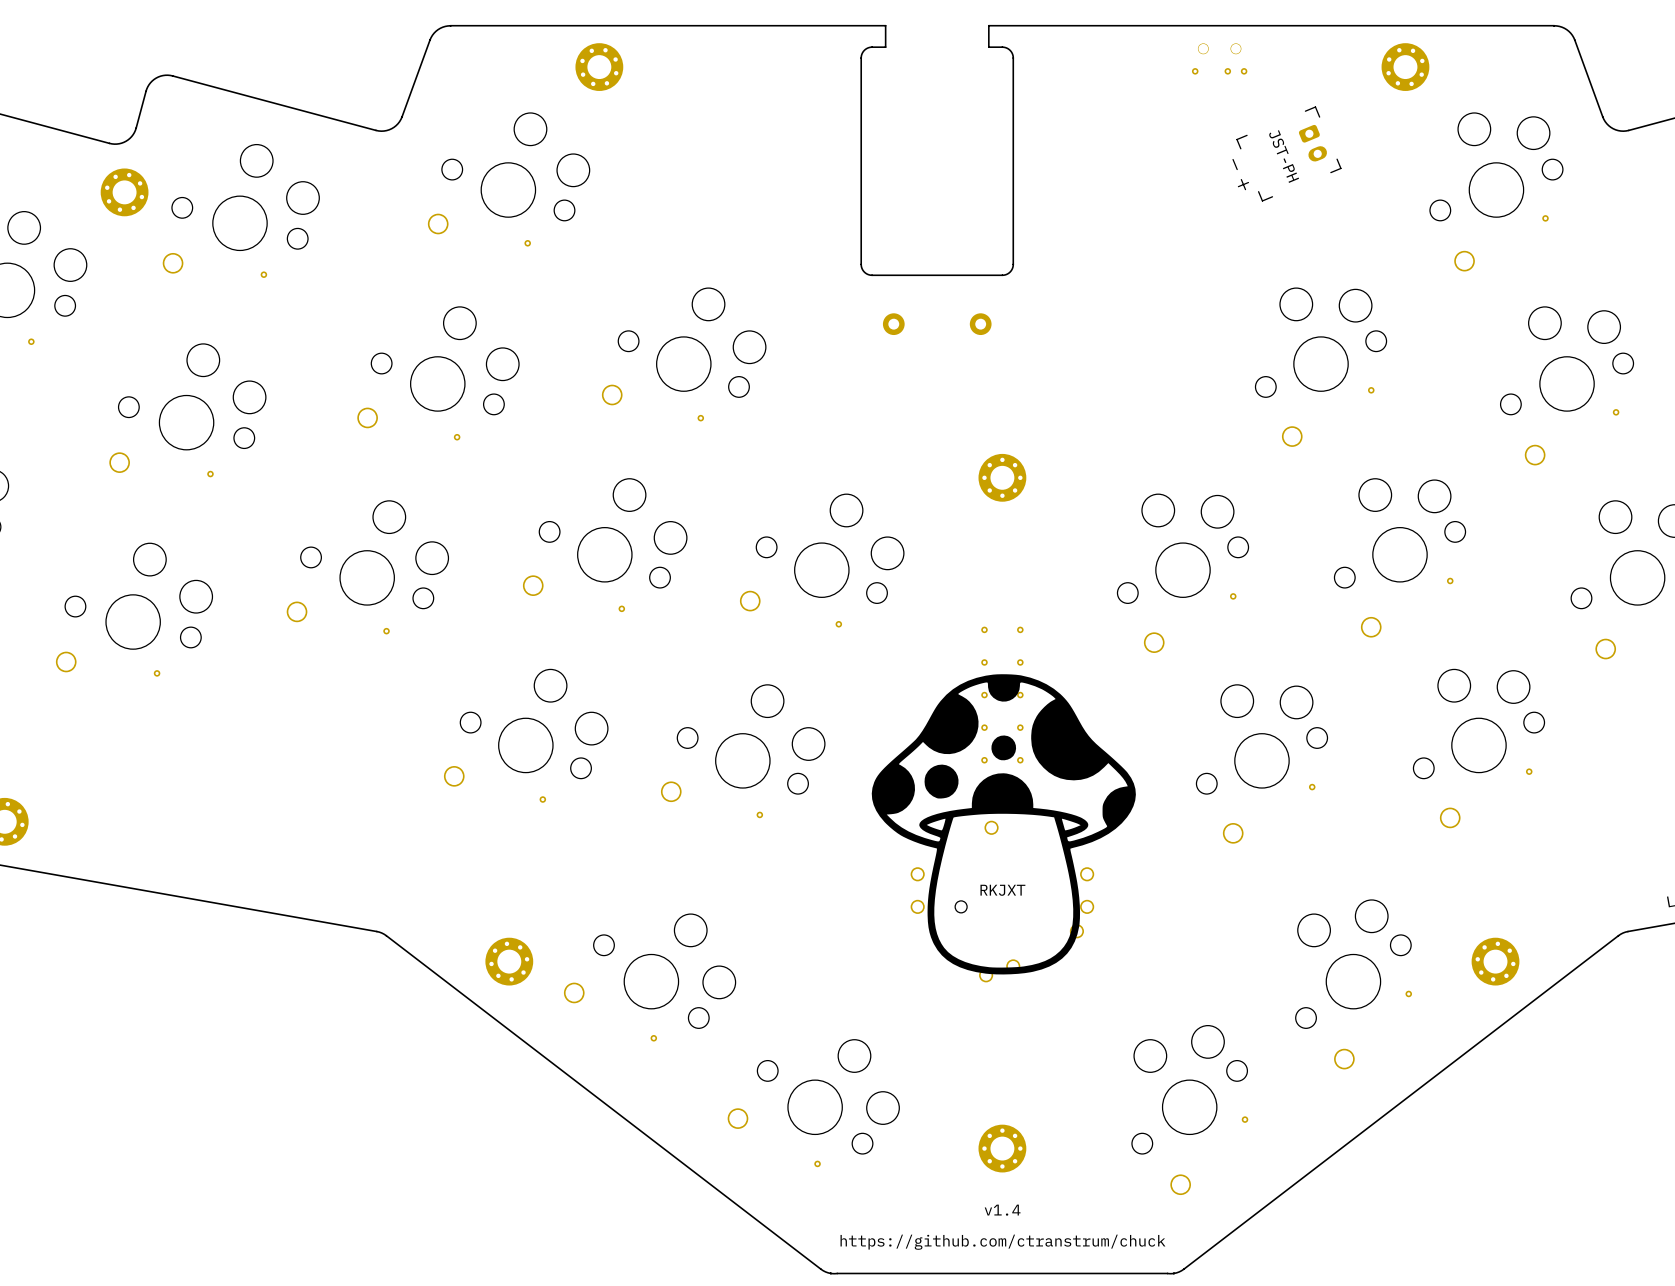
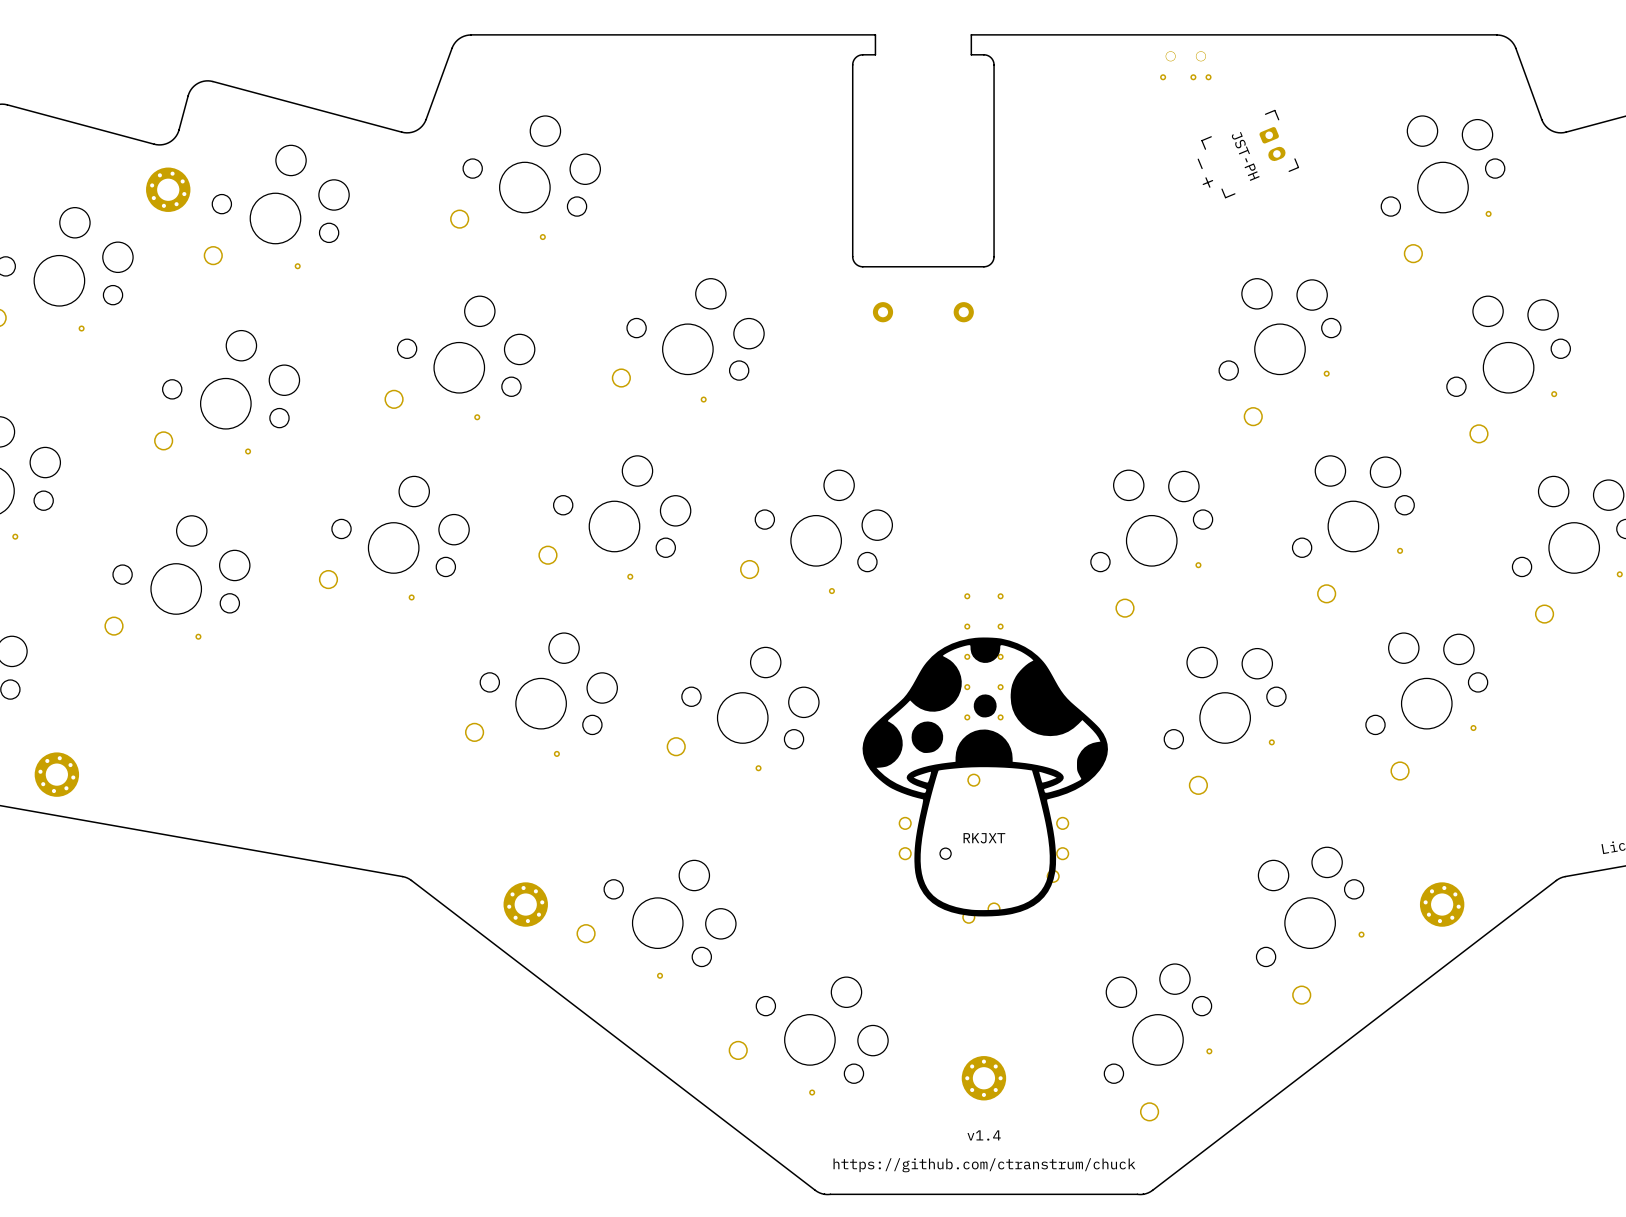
part: (599, 67) -> none
part: (1405, 67) -> none
part: (1002, 477) -> none

